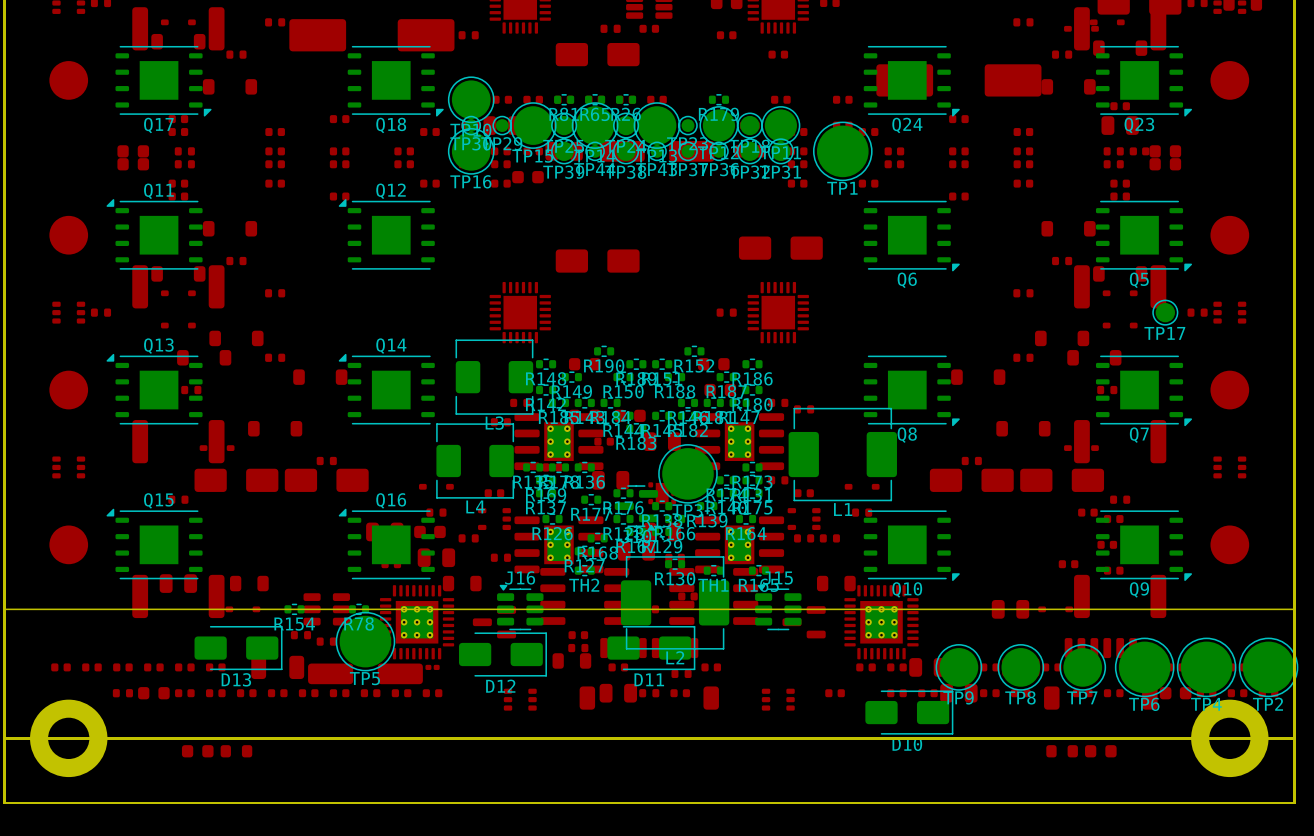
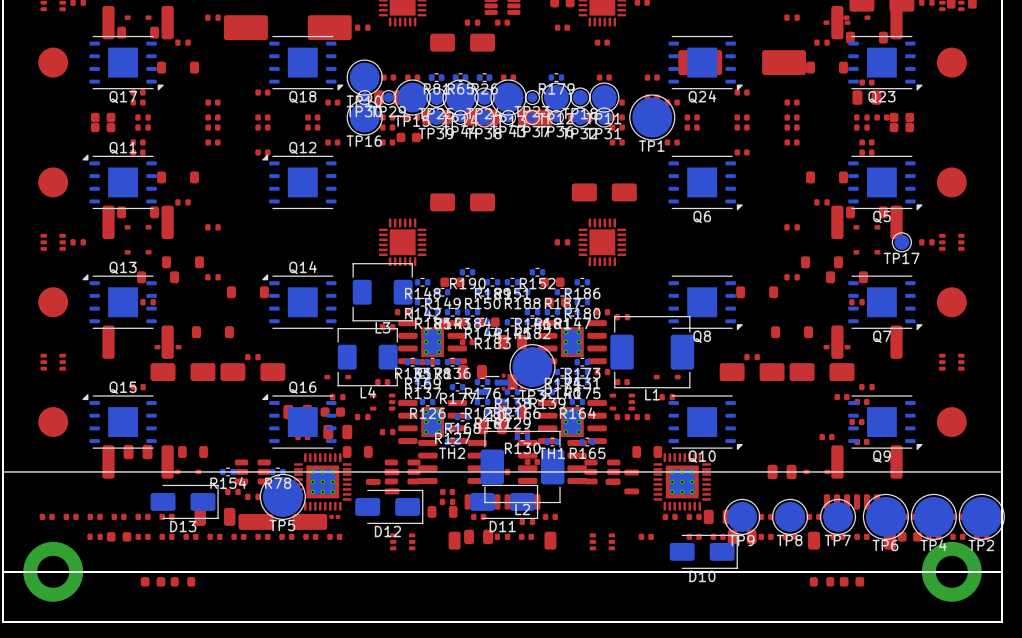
J16: (520, 607) -> none
J15: (778, 607) -> none
part: none -> (402, 471)
part: none -> (602, 471)

